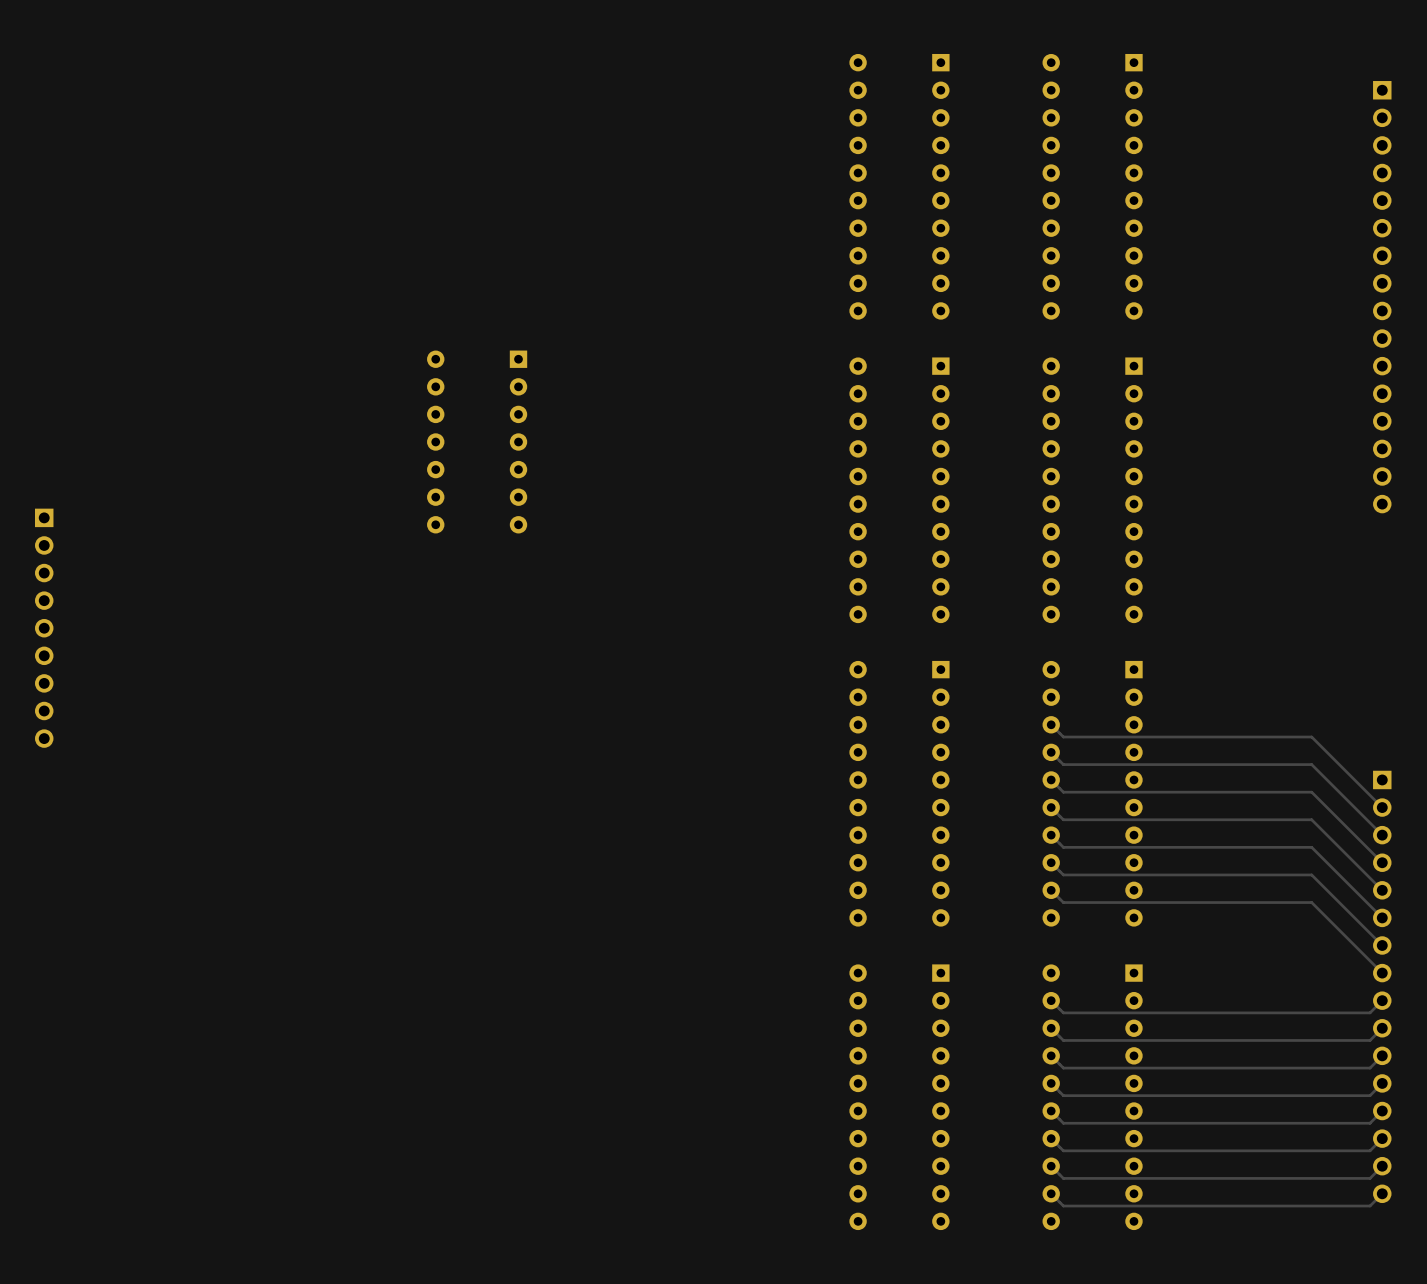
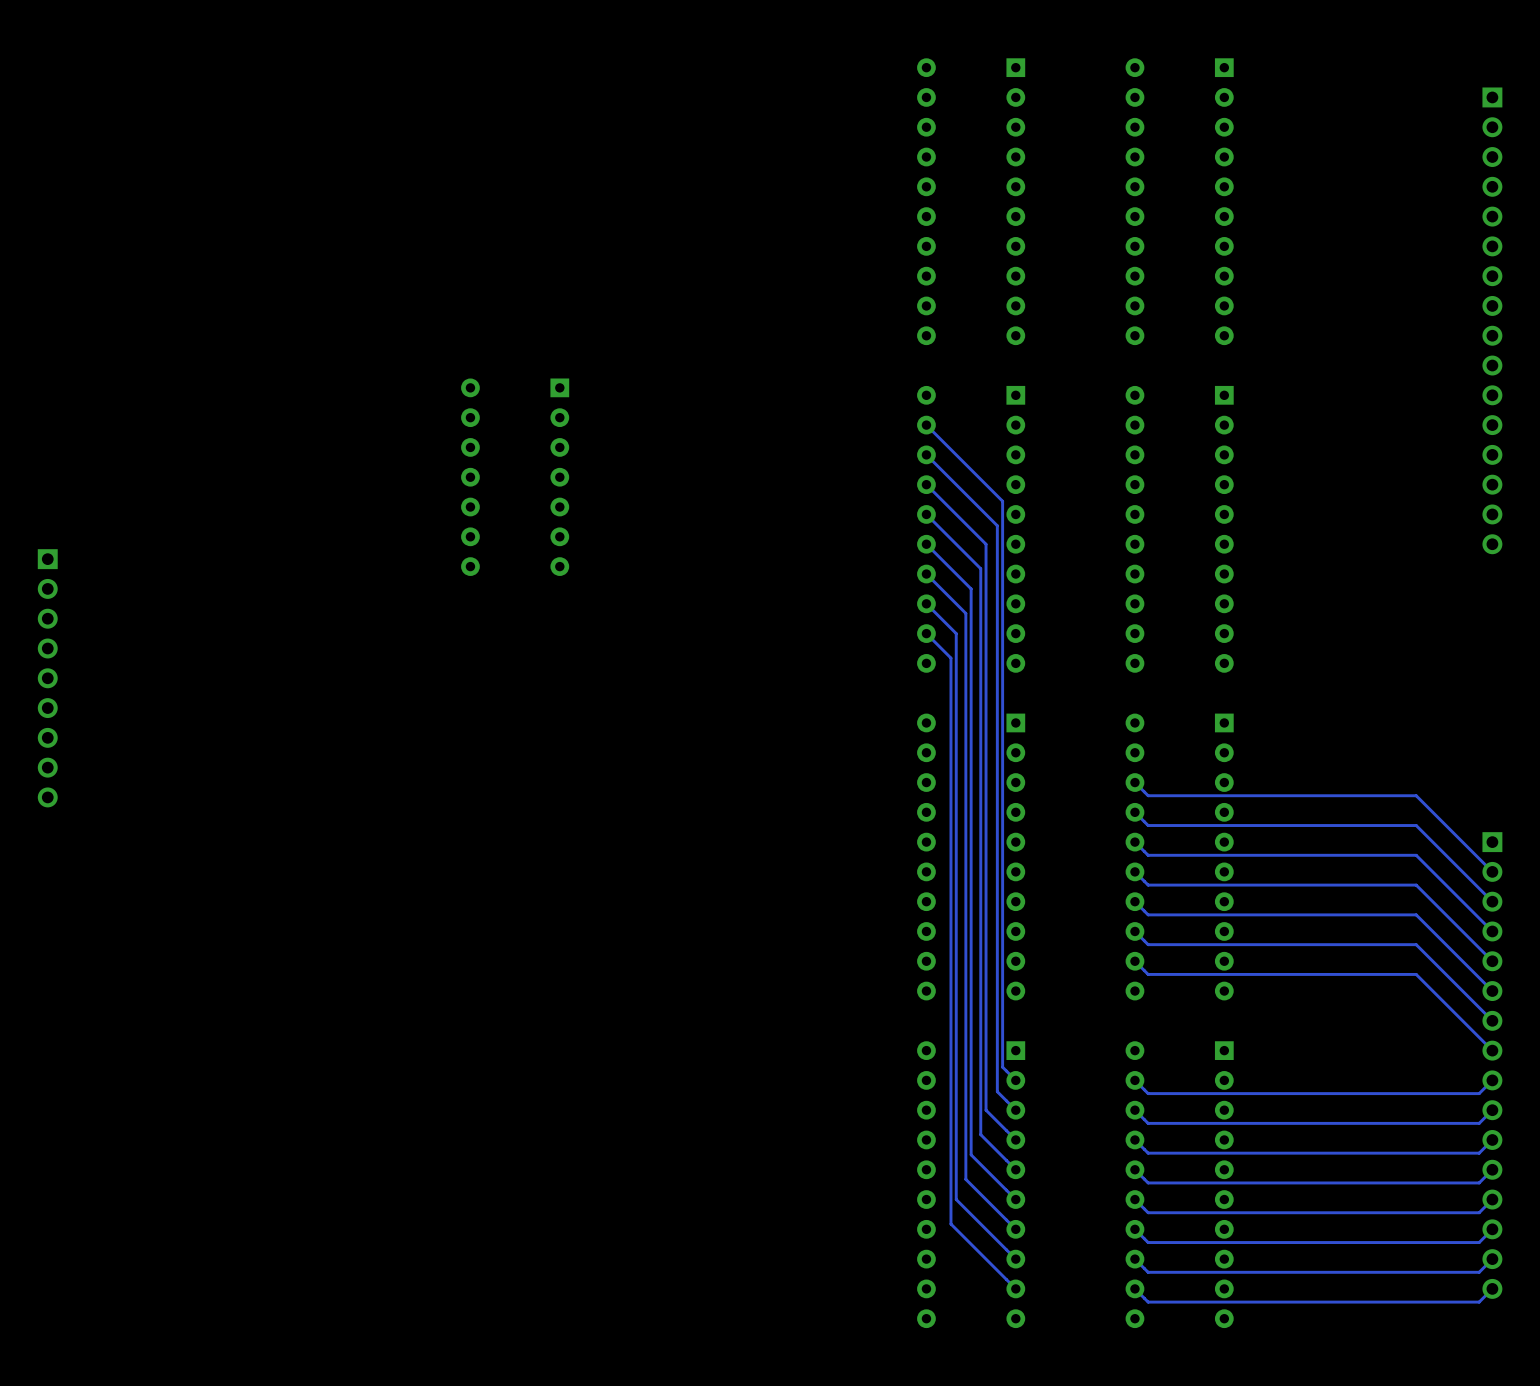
track: none -> (926, 425) (1002, 501) (1002, 1067) (1015, 1080)
track: none -> (926, 454) (997, 525) (997, 1091) (1015, 1110)
track: none -> (926, 484) (986, 544) (986, 1110) (1015, 1139)
track: none -> (926, 514) (980, 568) (980, 1134) (1015, 1169)
track: none -> (926, 544) (971, 588) (971, 1154) (1015, 1199)
track: none -> (926, 574) (965, 613) (965, 1179) (1015, 1229)
track: none -> (926, 603) (956, 633) (956, 1199) (1015, 1259)
track: none -> (926, 633) (950, 658) (950, 1224) (1015, 1288)

